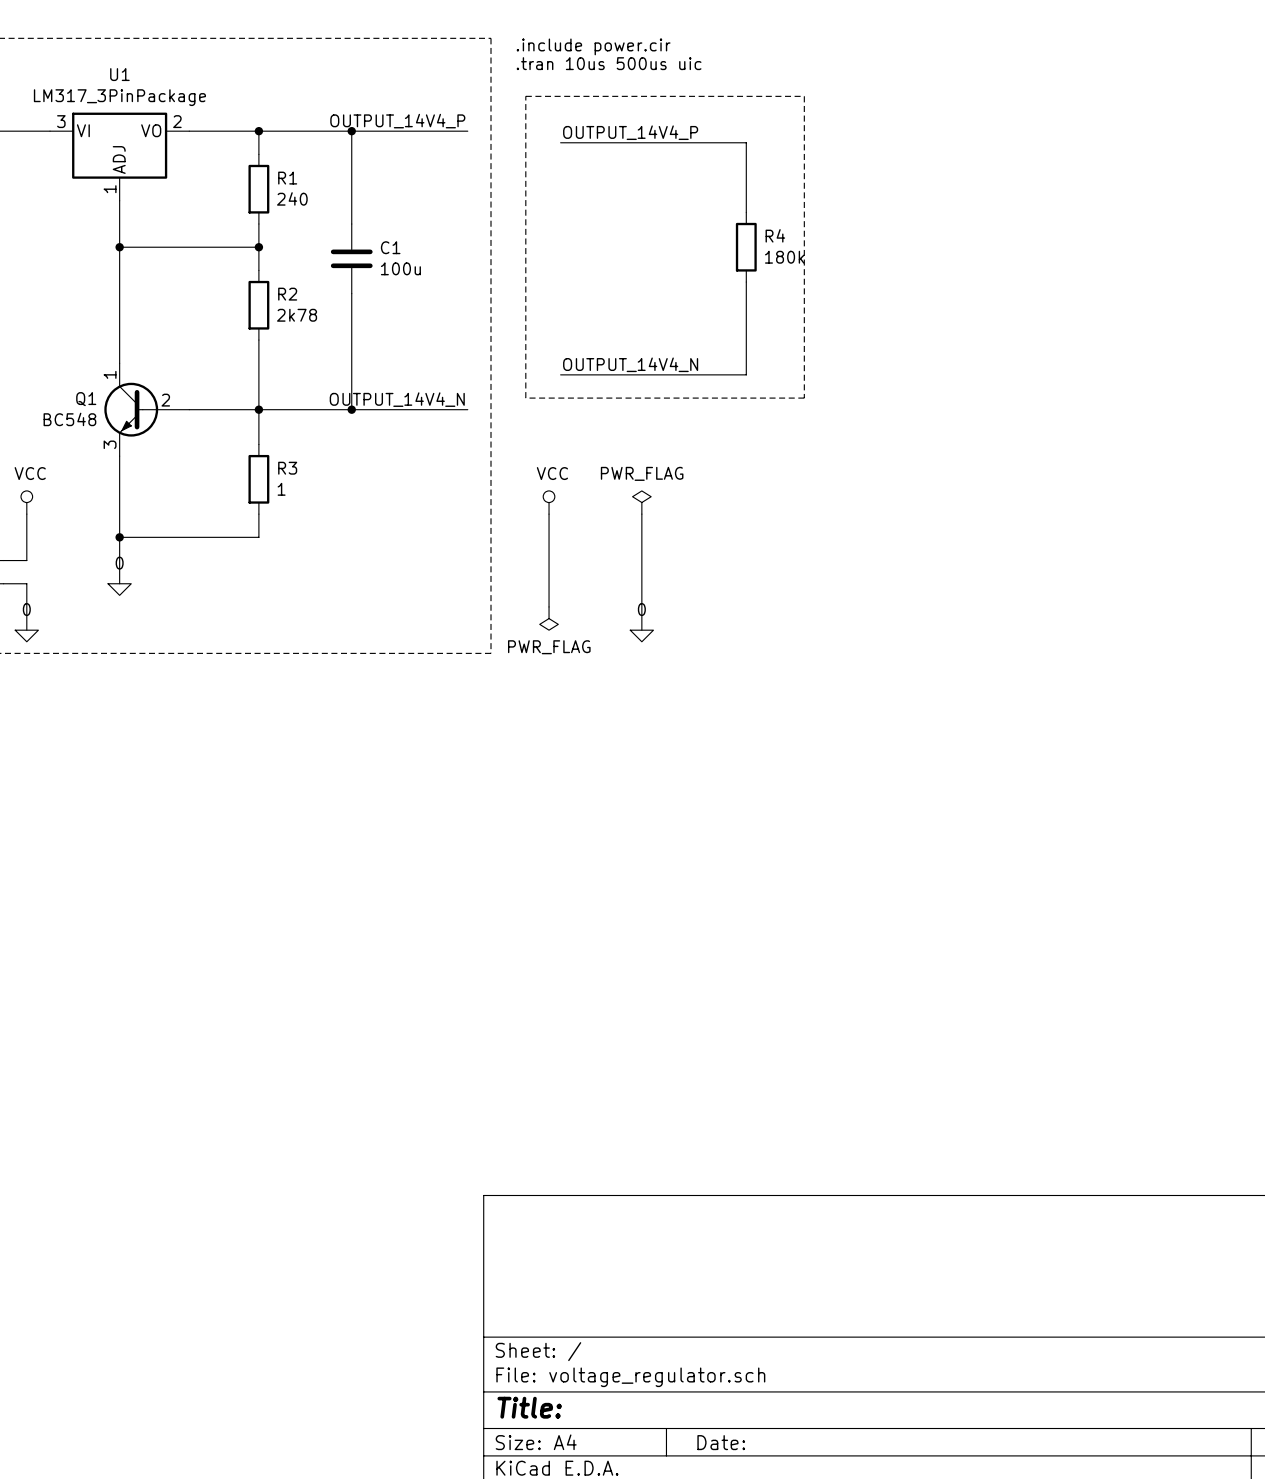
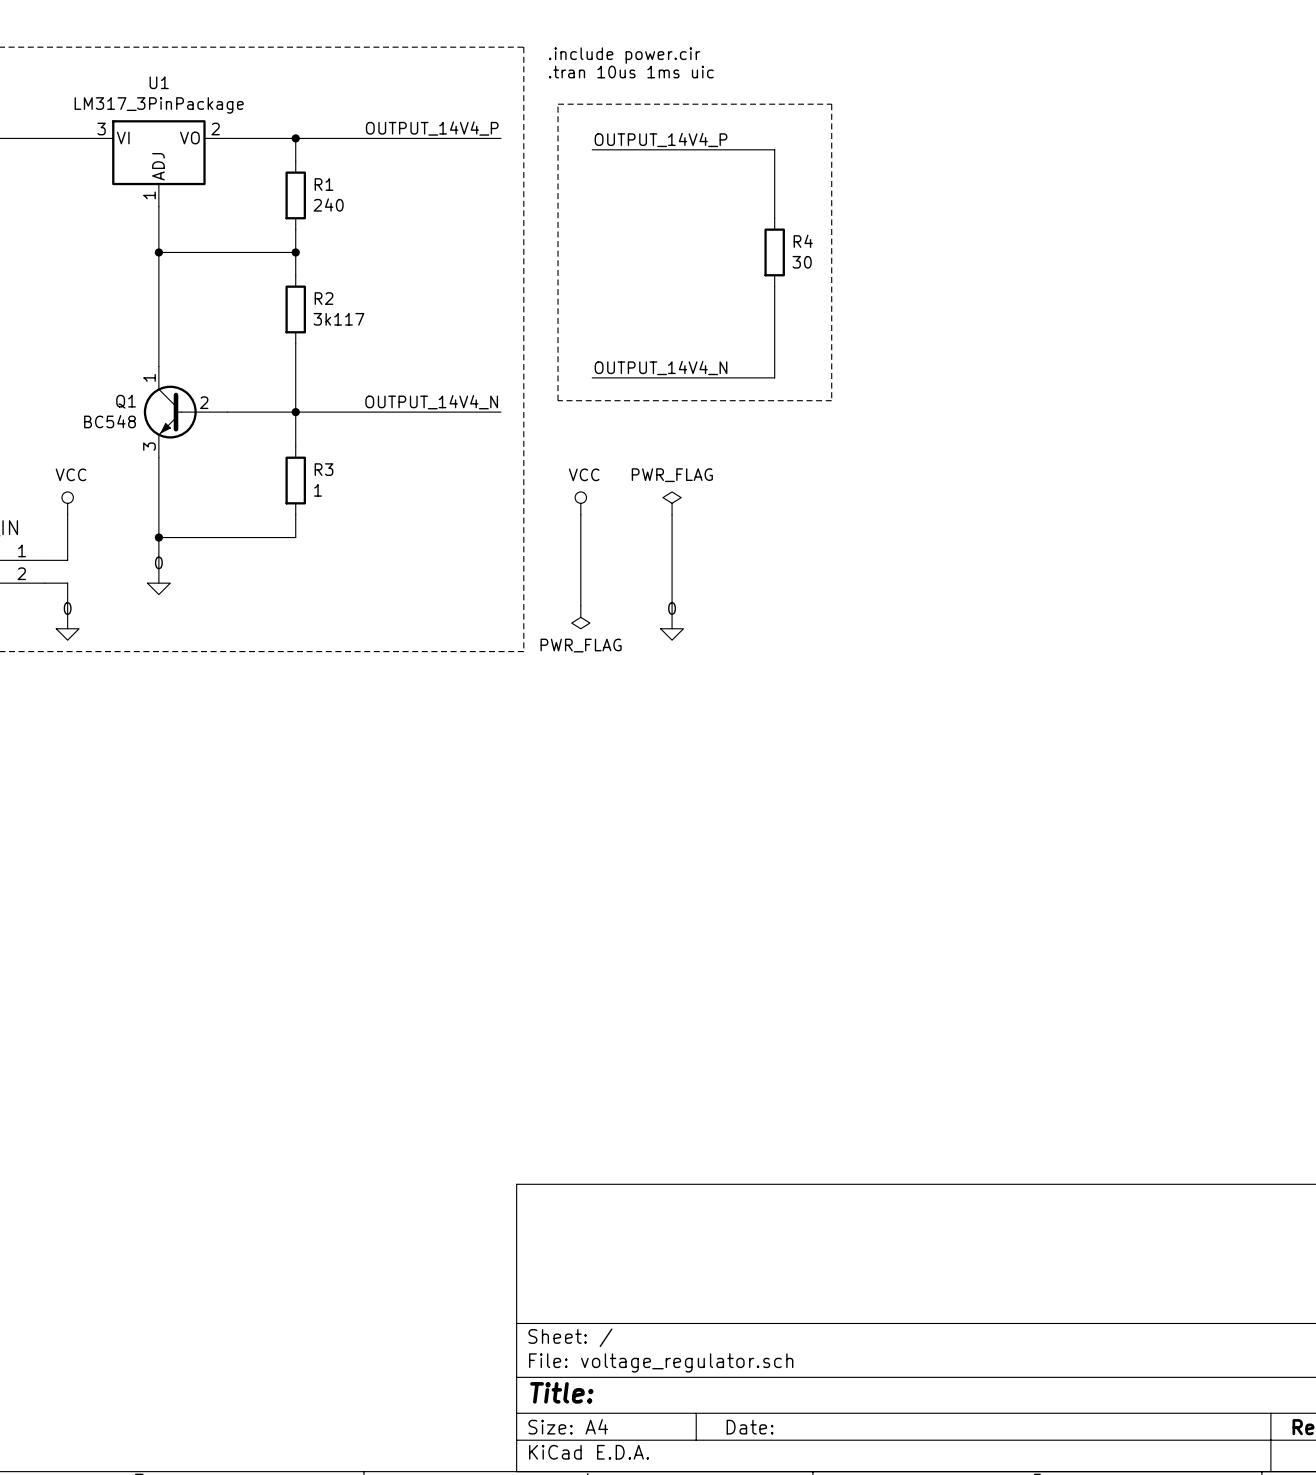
text: .tran 10us 500us uic (609, 63) -> .tran 10us 1ms uic (631, 72)
wire: (351, 131) (351, 224) -> none
junction: (351, 131) -> none
R4 value: 180k (784, 257) -> 30 (802, 262)
C1: 100u (351, 258) -> none
wire: (351, 293) (351, 409) -> none
R2 value: 2k78 (297, 315) -> 3k117 (338, 319)
junction: (351, 409) -> none

